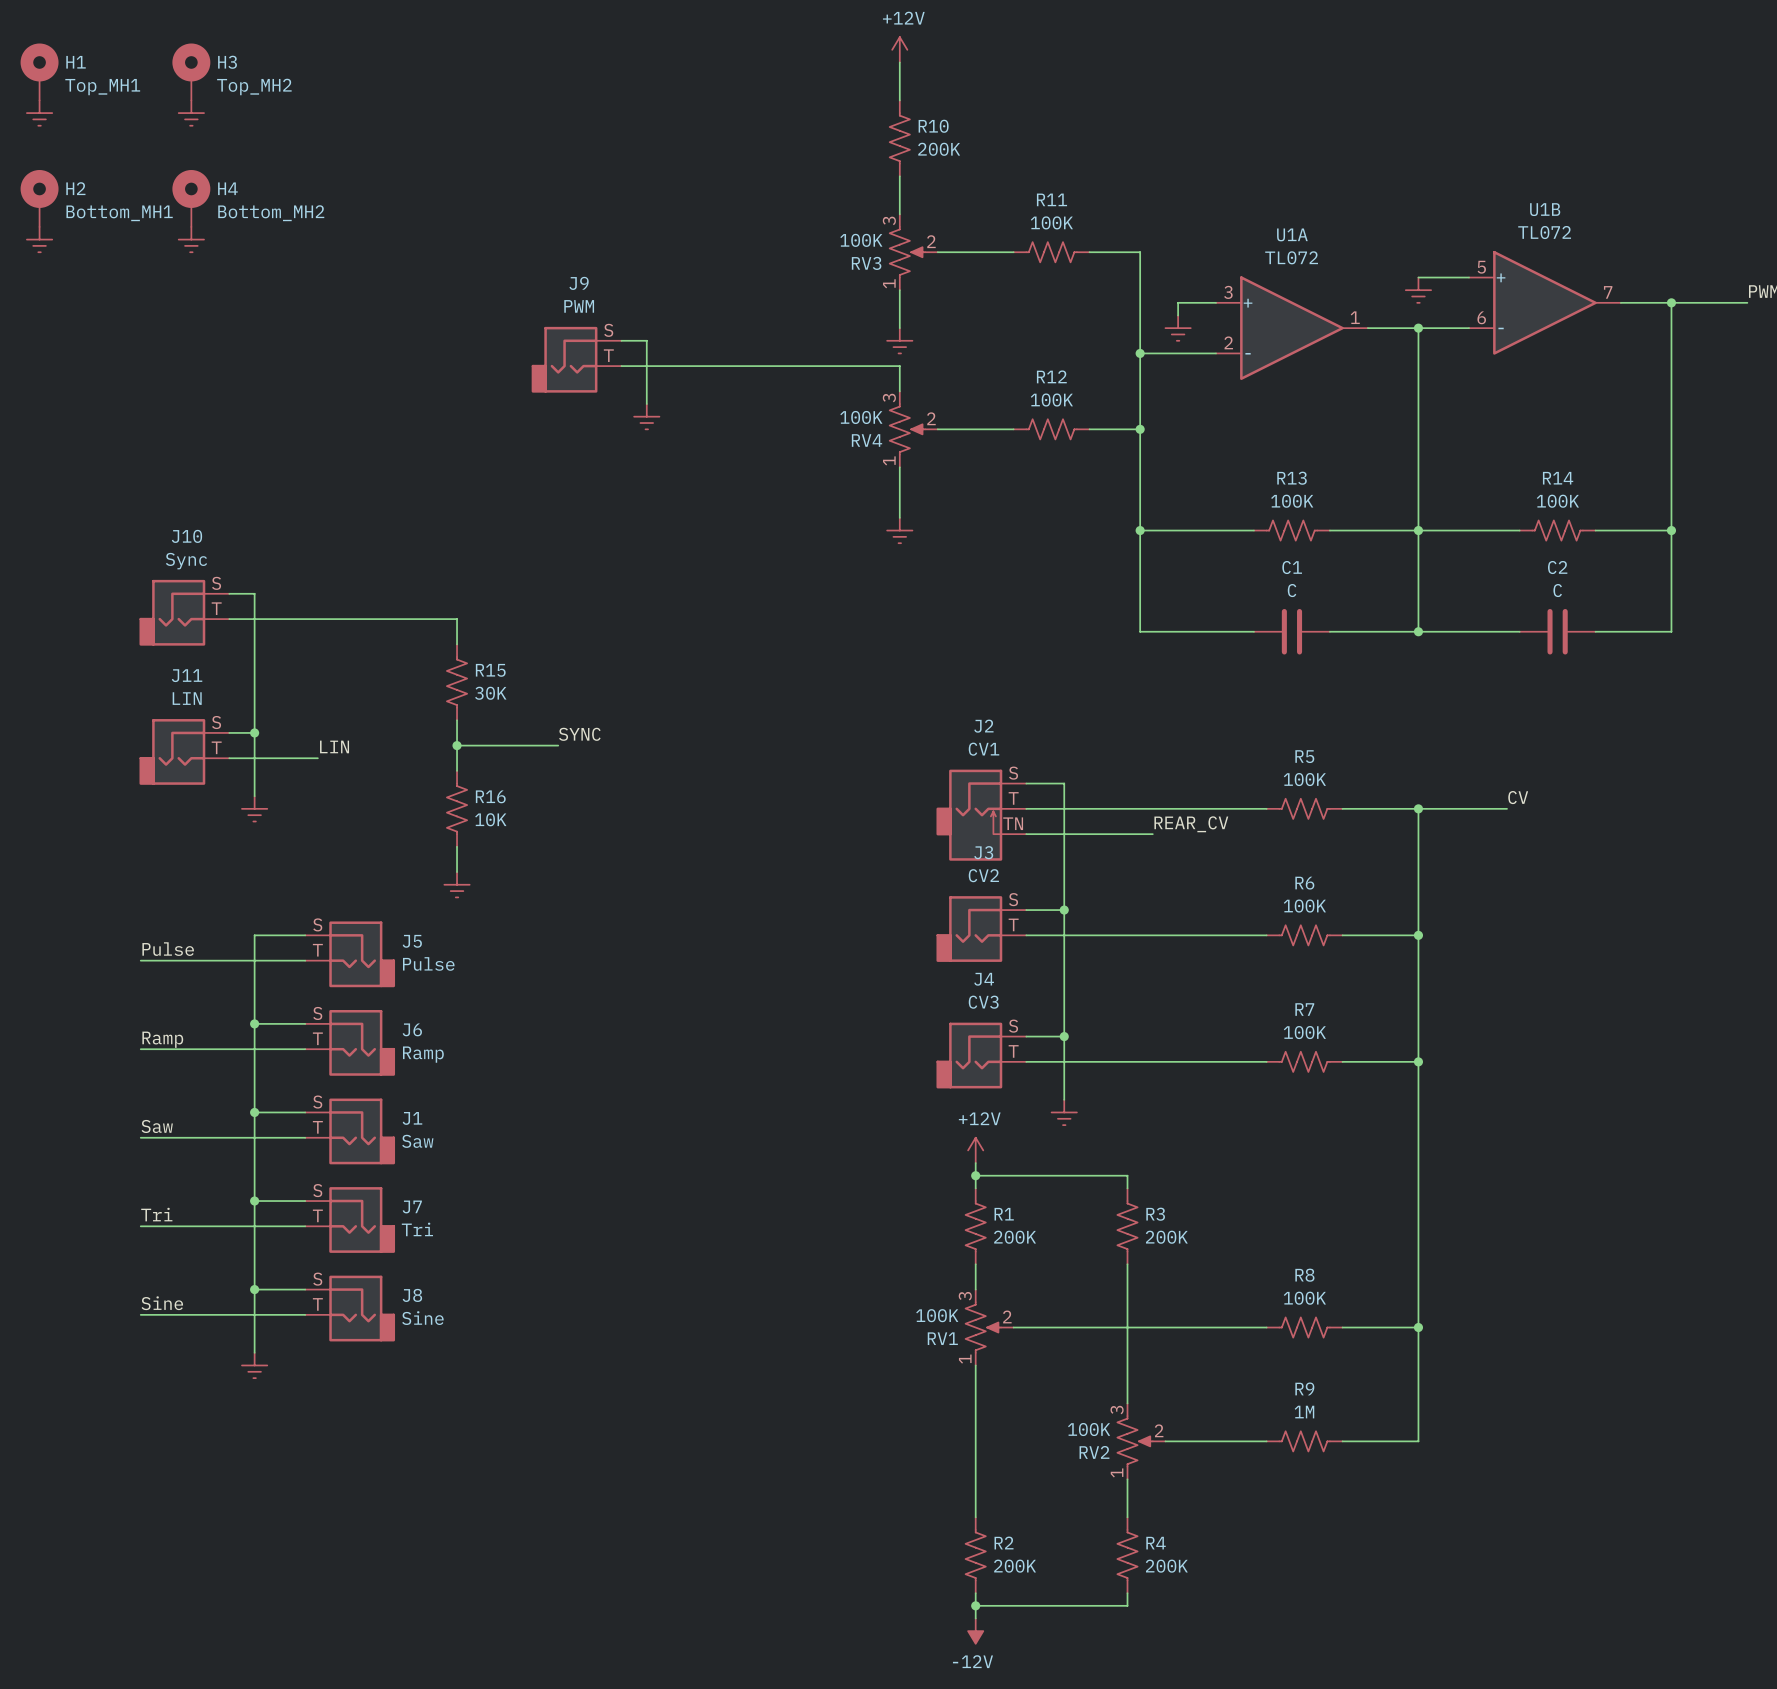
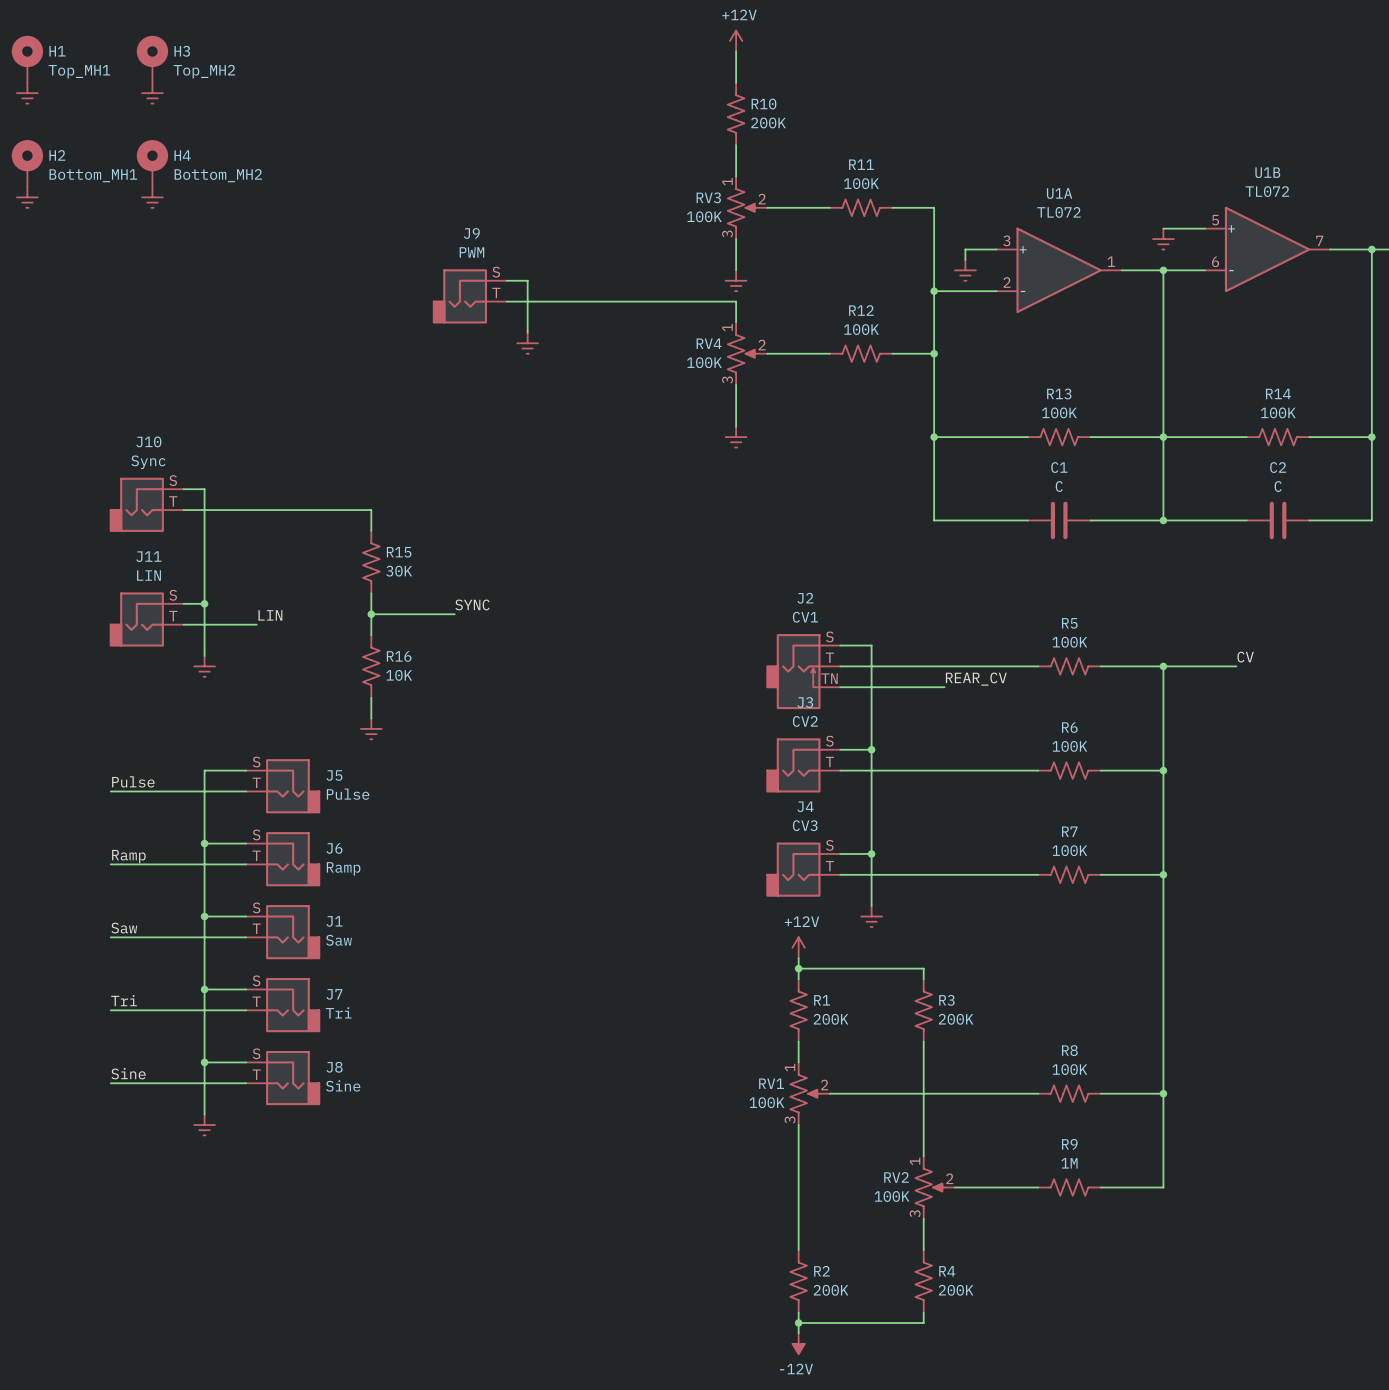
RV3 flip: as is (907, 252) -> up-down (742, 207)
RV4 flip: as is (907, 429) -> up-down (742, 353)
RV1 flip: as is (983, 1327) -> up-down (804, 1093)
RV2 flip: as is (1135, 1441) -> up-down (929, 1187)

